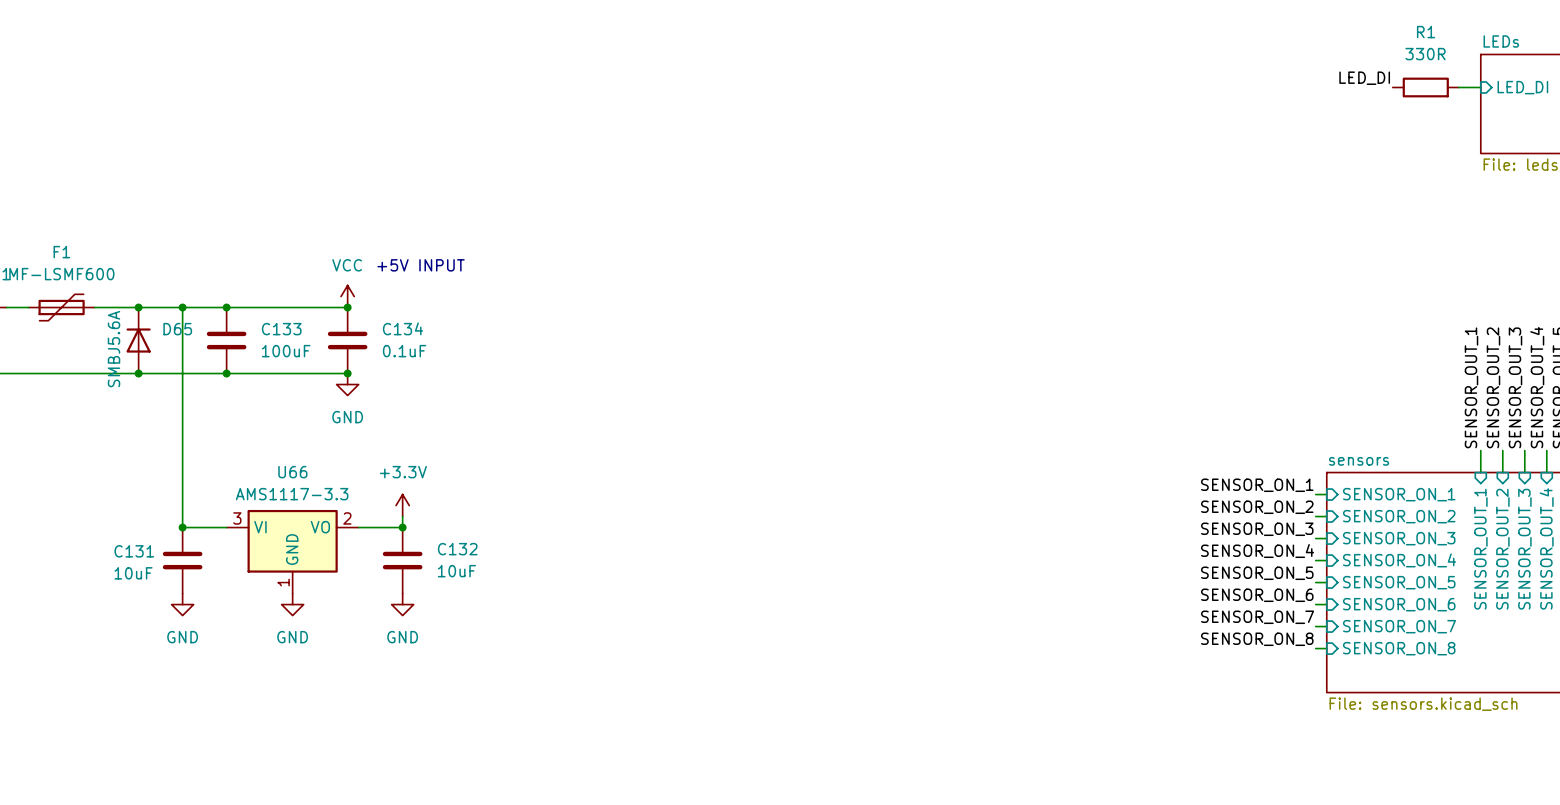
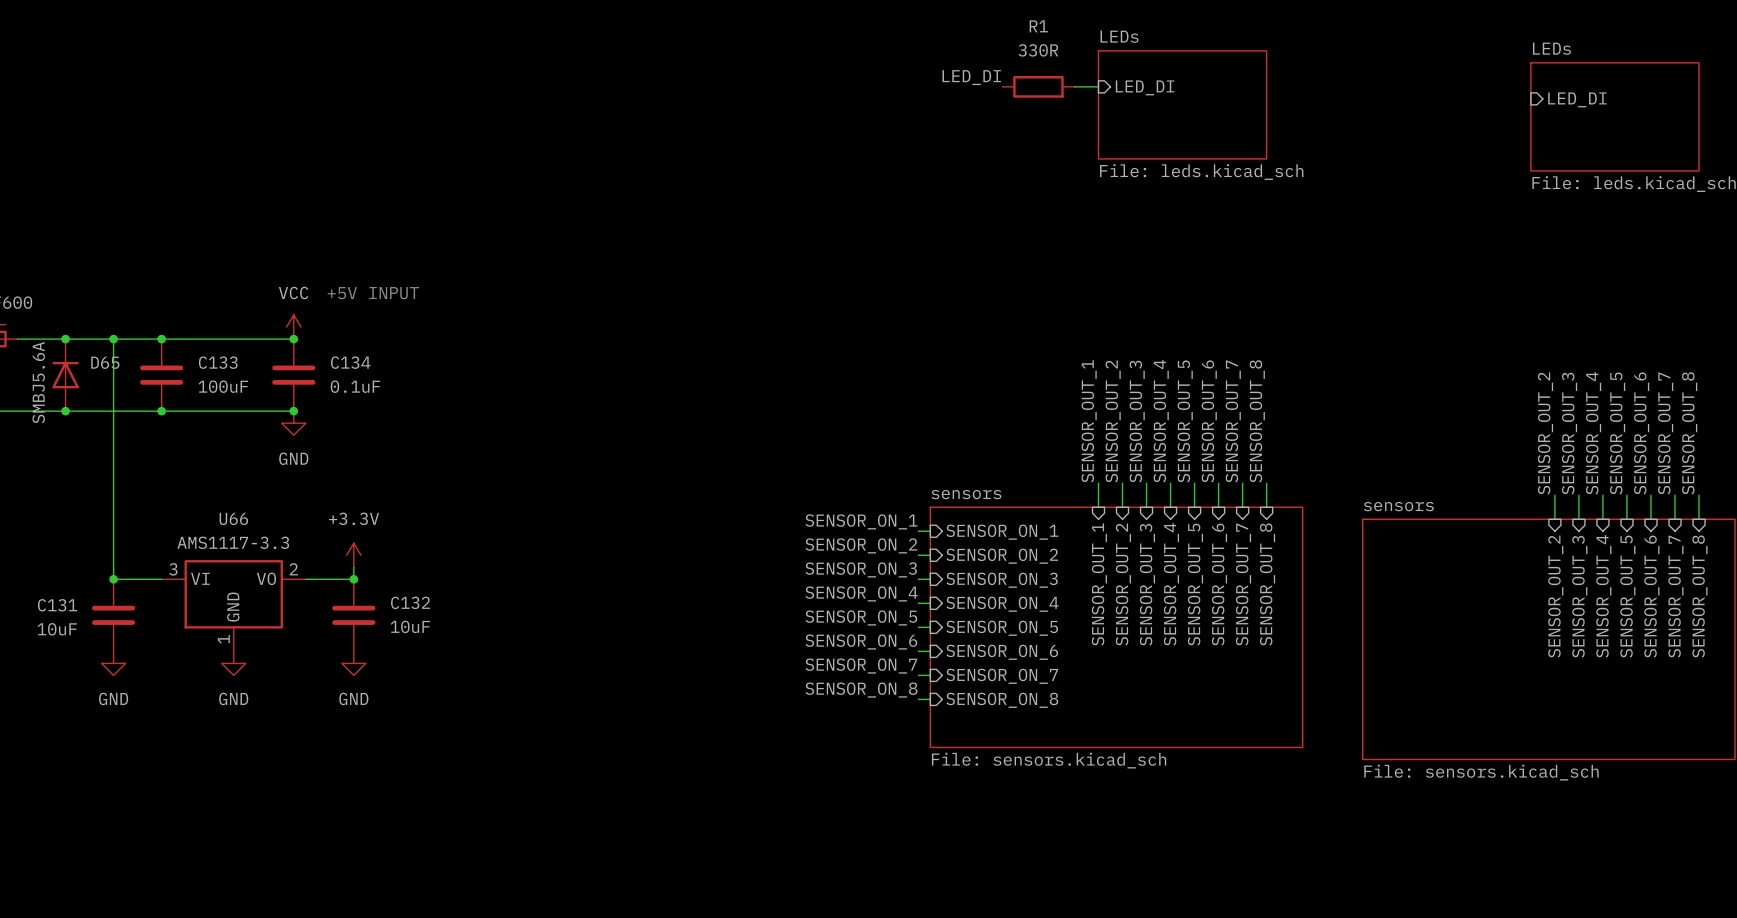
label: none -> LED_DI (971, 77)
wire: none -> (1074, 86) (1098, 86)
sheet pin: none -> LED_DI (1145, 87)
label: LED_DI (1364, 78) -> none
R1 position: (1425, 87) -> (1038, 86)
wire: (1458, 87) (1480, 87) -> none
sheet LEDs: none -> File: leds.kicad_sch (1182, 104)
label: none -> SENSOR_OUT_1 (1089, 421)
label: none -> SENSOR_OUT_2 (1113, 421)
label: none -> SENSOR_OUT_3 (1137, 421)
label: none -> SENSOR_OUT_4 (1161, 421)
label: none -> SENSOR_OUT_5 (1185, 421)
label: none -> SENSOR_OUT_6 (1209, 421)
label: none -> SENSOR_OUT_7 (1233, 421)
label: none -> SENSOR_OUT_8 (1257, 421)
label: SENSOR_OUT_1 (1471, 387) -> none
wire: none -> (1098, 483) (1098, 507)
wire: none -> (1122, 483) (1122, 507)
wire: none -> (1146, 483) (1146, 507)
wire: none -> (1170, 483) (1170, 507)
wire: none -> (1194, 483) (1194, 507)
wire: none -> (1218, 483) (1218, 507)
wire: none -> (1242, 483) (1242, 507)
wire: none -> (1266, 483) (1266, 507)
wire: (1480, 450) (1480, 472) -> none
label: none -> SENSOR_ON_1 (861, 521)
wire: none -> (918, 531) (930, 531)
sheet pin: none -> SENSOR_ON_1 (1002, 532)
label: SENSOR_ON_1 (1257, 485) -> none
wire: (1315, 494) (1326, 494) -> none
sheet pin: SENSOR_ON_1 (1399, 494) -> none
label: none -> SENSOR_ON_2 (861, 545)
wire: none -> (918, 555) (930, 555)
sheet pin: none -> SENSOR_ON_2 (1002, 556)
label: SENSOR_ON_2 (1257, 507) -> none
wire: (1315, 516) (1326, 516) -> none
sheet pin: SENSOR_ON_2 (1399, 516) -> none
label: none -> SENSOR_ON_3 (861, 569)
wire: none -> (918, 579) (930, 579)
sheet pin: none -> SENSOR_ON_3 (1002, 580)
label: SENSOR_ON_3 (1257, 529) -> none
sheet pin: none -> SENSOR_OUT_4 (1171, 584)
sheet pin: none -> SENSOR_OUT_7 (1243, 584)
sheet pin: none -> SENSOR_OUT_1 (1099, 584)
sheet pin: none -> SENSOR_OUT_2 (1123, 584)
sheet pin: none -> SENSOR_OUT_3 (1147, 584)
sheet pin: none -> SENSOR_OUT_5 (1195, 584)
sheet pin: none -> SENSOR_OUT_6 (1219, 584)
sheet pin: none -> SENSOR_OUT_8 (1267, 584)
wire: (1315, 538) (1326, 538) -> none
sheet pin: SENSOR_ON_3 (1399, 538) -> none
label: none -> SENSOR_ON_4 (861, 593)
wire: none -> (918, 603) (930, 603)
sheet pin: none -> SENSOR_ON_4 (1002, 604)
sheet pin: SENSOR_OUT_1 (1480, 549) -> none
label: SENSOR_ON_4 (1257, 551) -> none
wire: (1315, 560) (1326, 560) -> none
sheet pin: SENSOR_ON_4 (1399, 560) -> none
label: none -> SENSOR_ON_5 (861, 617)
wire: none -> (918, 627) (930, 627)
sheet pin: none -> SENSOR_ON_5 (1002, 628)
sheet sensors: none -> File: sensors.kicad_sch (1116, 627)
label: SENSOR_ON_5 (1257, 573) -> none
wire: (1315, 582) (1326, 582) -> none
sheet pin: SENSOR_ON_5 (1399, 582) -> none
label: none -> SENSOR_ON_6 (861, 642)
wire: none -> (918, 651) (930, 651)
sheet pin: none -> SENSOR_ON_6 (1002, 652)
label: SENSOR_ON_6 (1257, 595) -> none
wire: (1315, 604) (1326, 604) -> none
sheet pin: SENSOR_ON_6 (1399, 604) -> none
label: none -> SENSOR_ON_7 (861, 666)
wire: none -> (918, 675) (930, 675)
sheet pin: none -> SENSOR_ON_7 (1002, 676)
label: SENSOR_ON_7 (1257, 617) -> none
wire: (1315, 626) (1326, 626) -> none
sheet pin: SENSOR_ON_7 (1399, 626) -> none
label: none -> SENSOR_ON_8 (861, 690)
wire: none -> (918, 699) (930, 699)
sheet pin: none -> SENSOR_ON_8 (1002, 700)
label: SENSOR_ON_8 (1257, 639) -> none
wire: (1315, 648) (1326, 648) -> none
sheet pin: SENSOR_ON_8 (1399, 648) -> none

